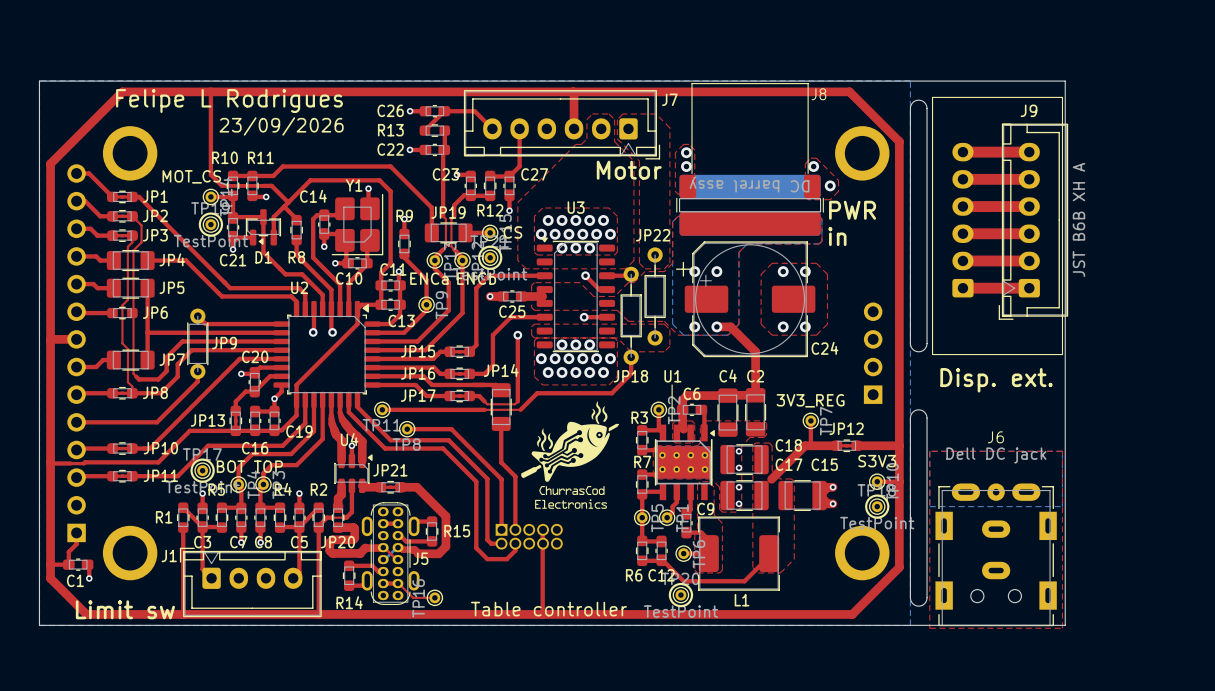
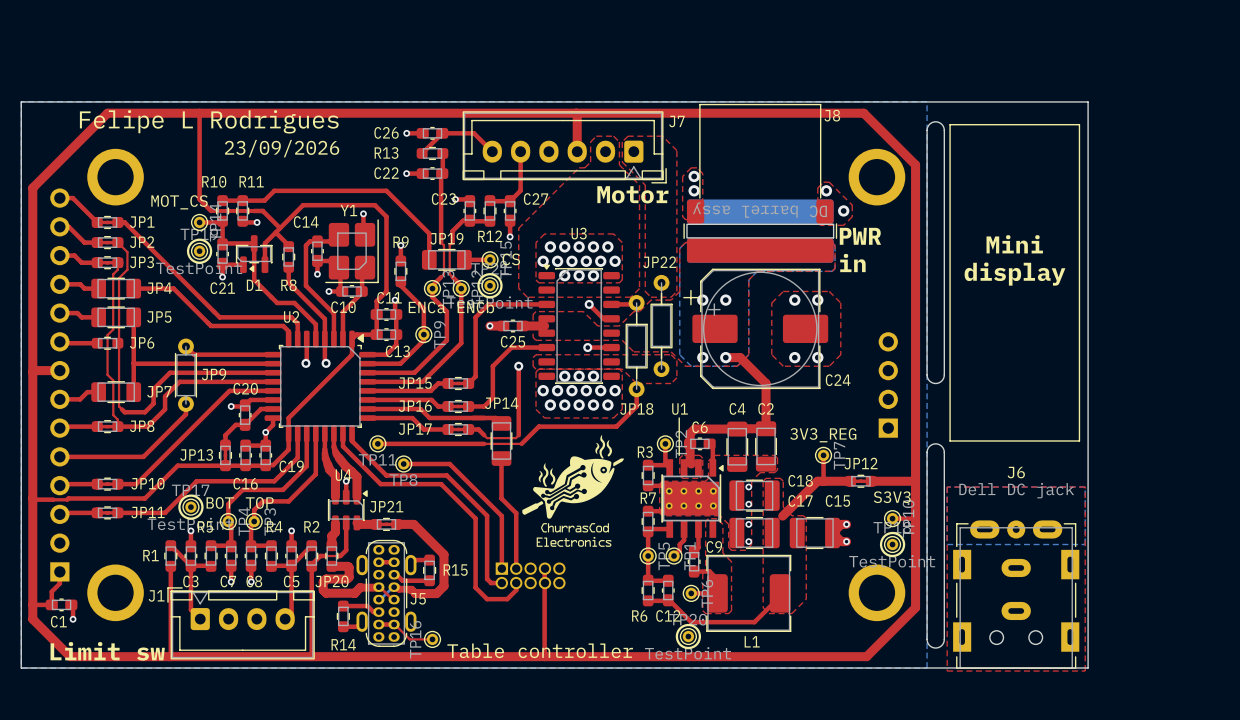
line: (932, 102) (932, 97) (1062, 97) (1062, 354) (932, 354) -> (950, 124) (1079, 124) (1079, 441) (950, 441) (950, 386)
top track: (962, 152) (1029, 152) -> none
top track: (962, 179) (1029, 179) -> none
top track: (962, 206) (1029, 206) -> none
text: none -> Mini (1014, 244)
part: (962, 220) -> none
J9: JST B6B XH A (1033, 221) -> none
top track: (962, 233) (1029, 233) -> none
text: none -> display (1015, 274)
top track: (962, 260) (1029, 260) -> none
top track: (962, 288) (1029, 288) -> none
text: Disp. ext. (996, 380) -> none

